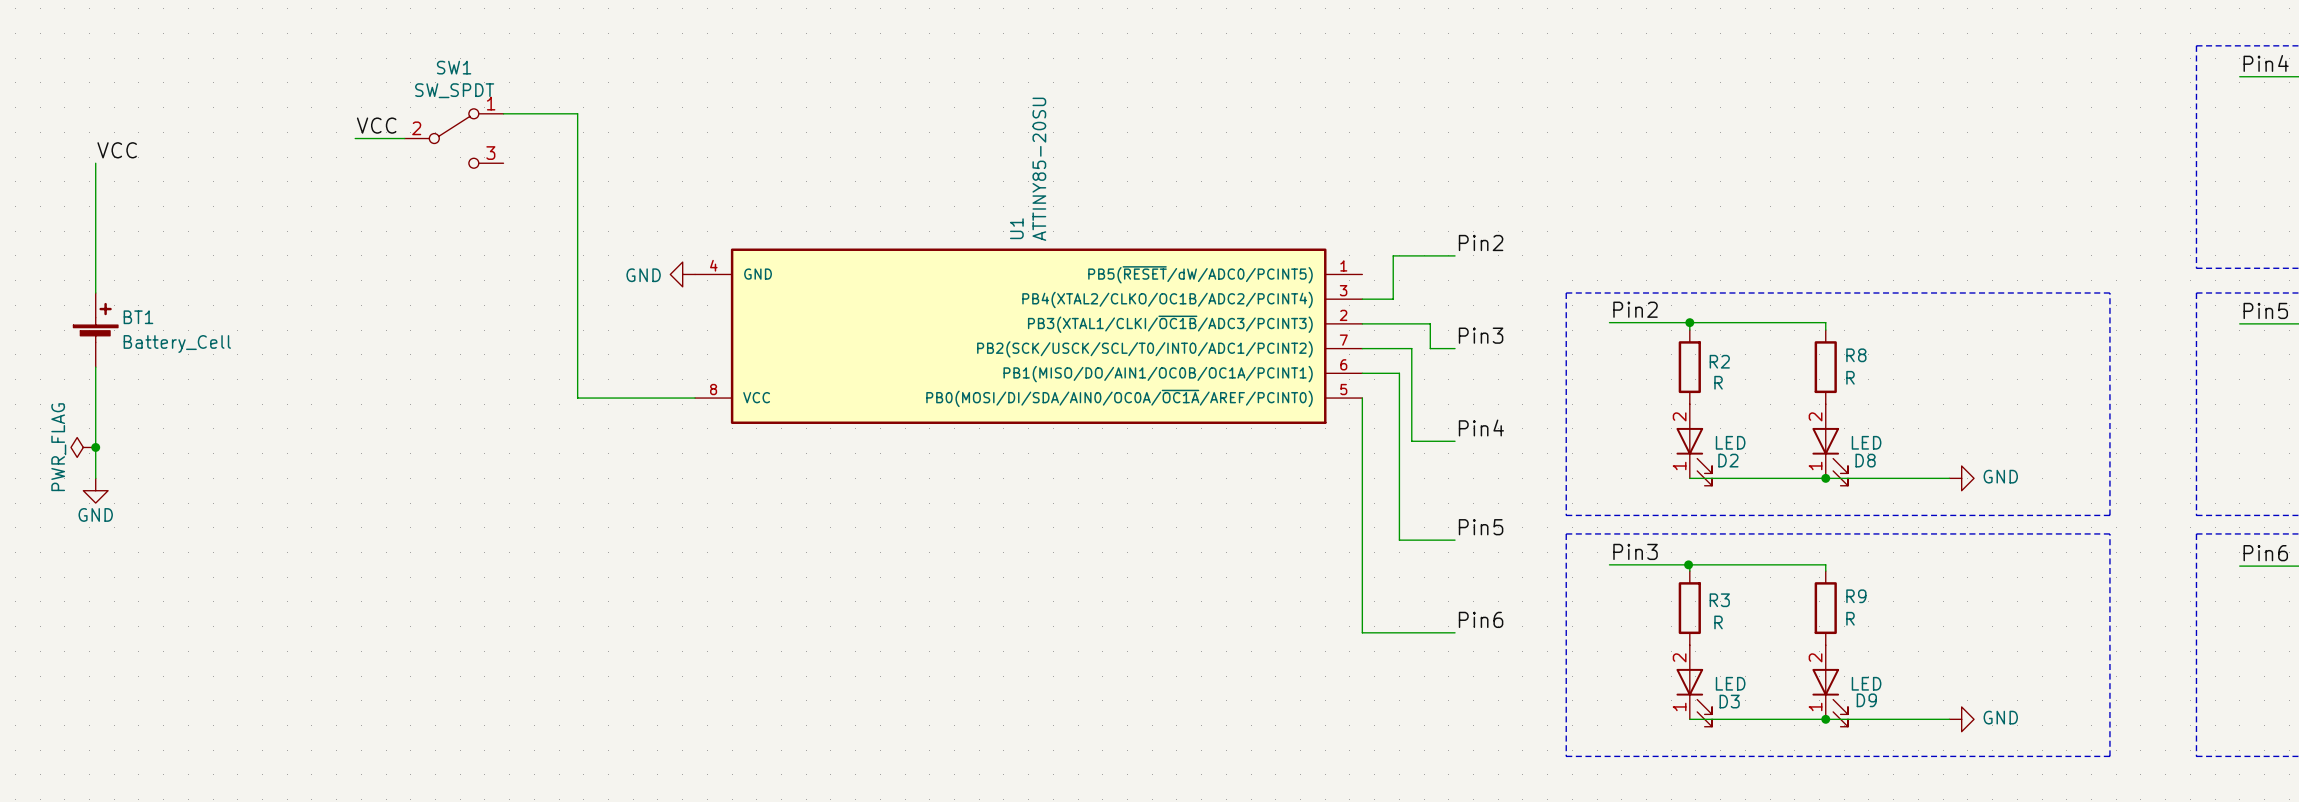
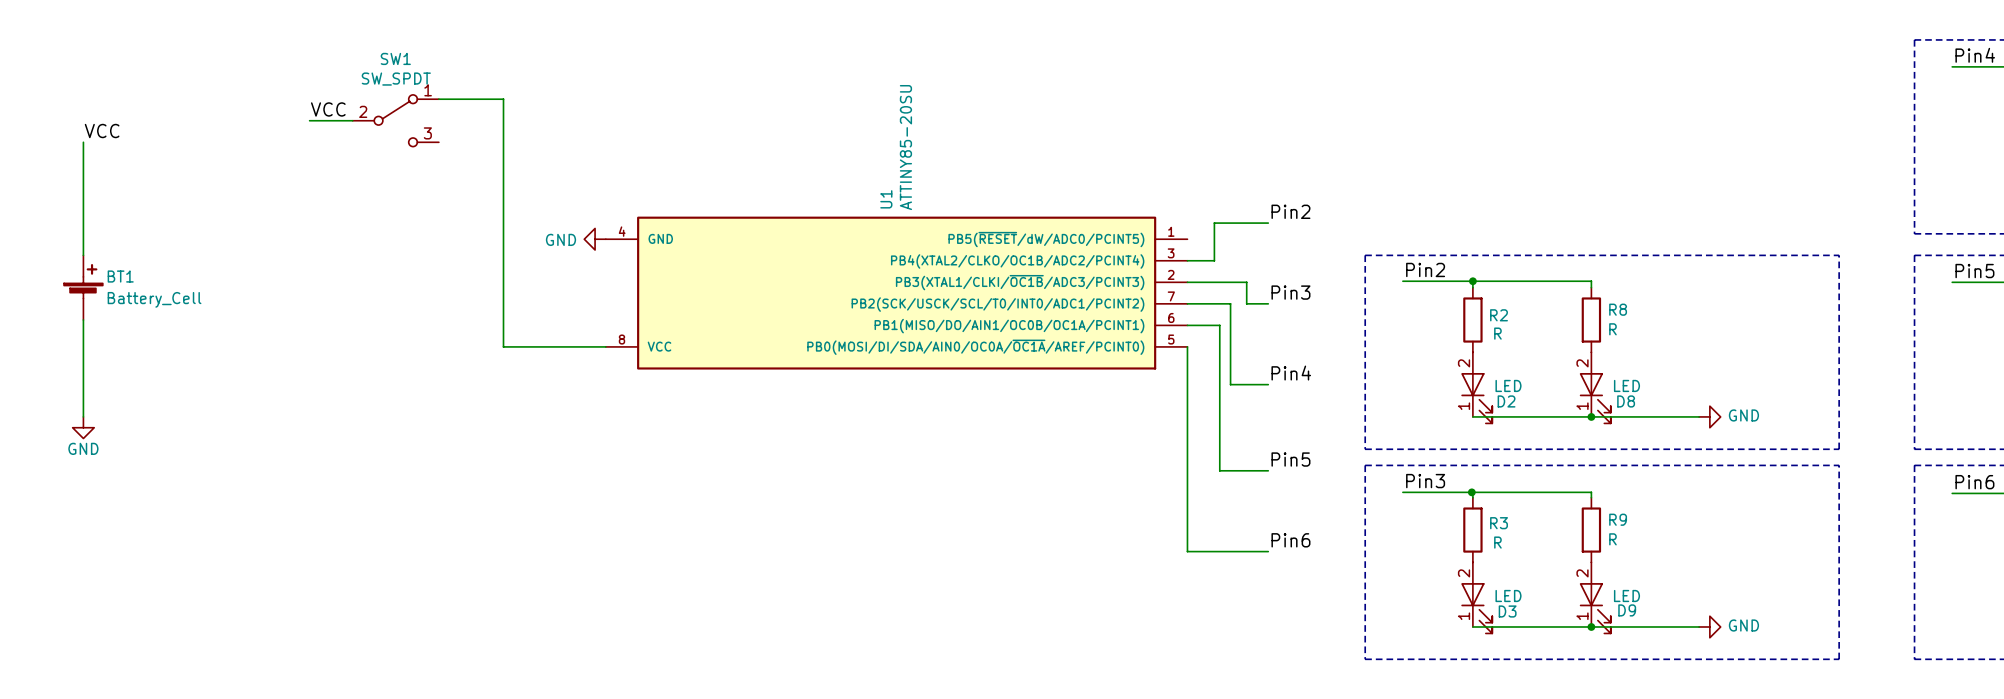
power symbol: PWR_FLAG (83, 447) -> none
junction: (95, 447) -> none

